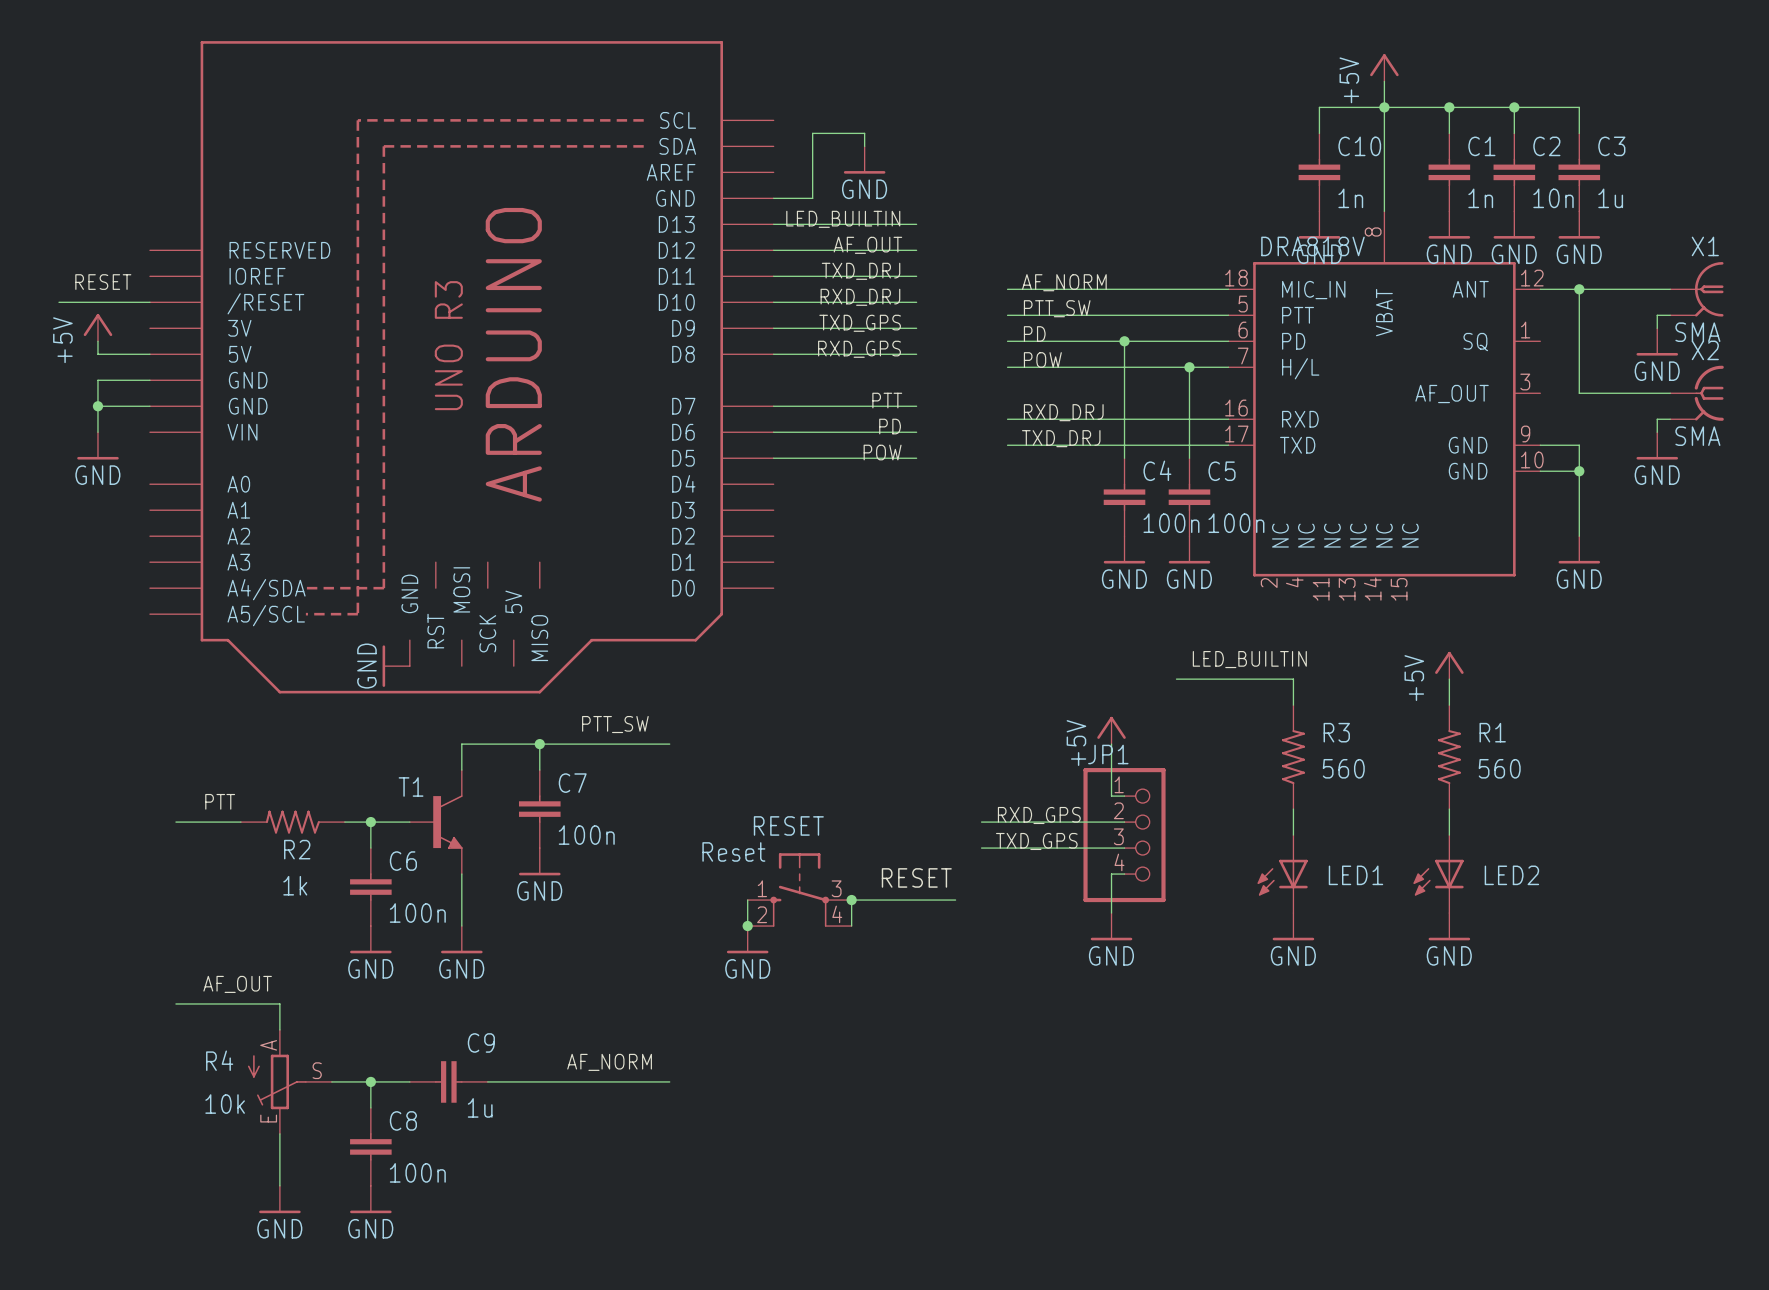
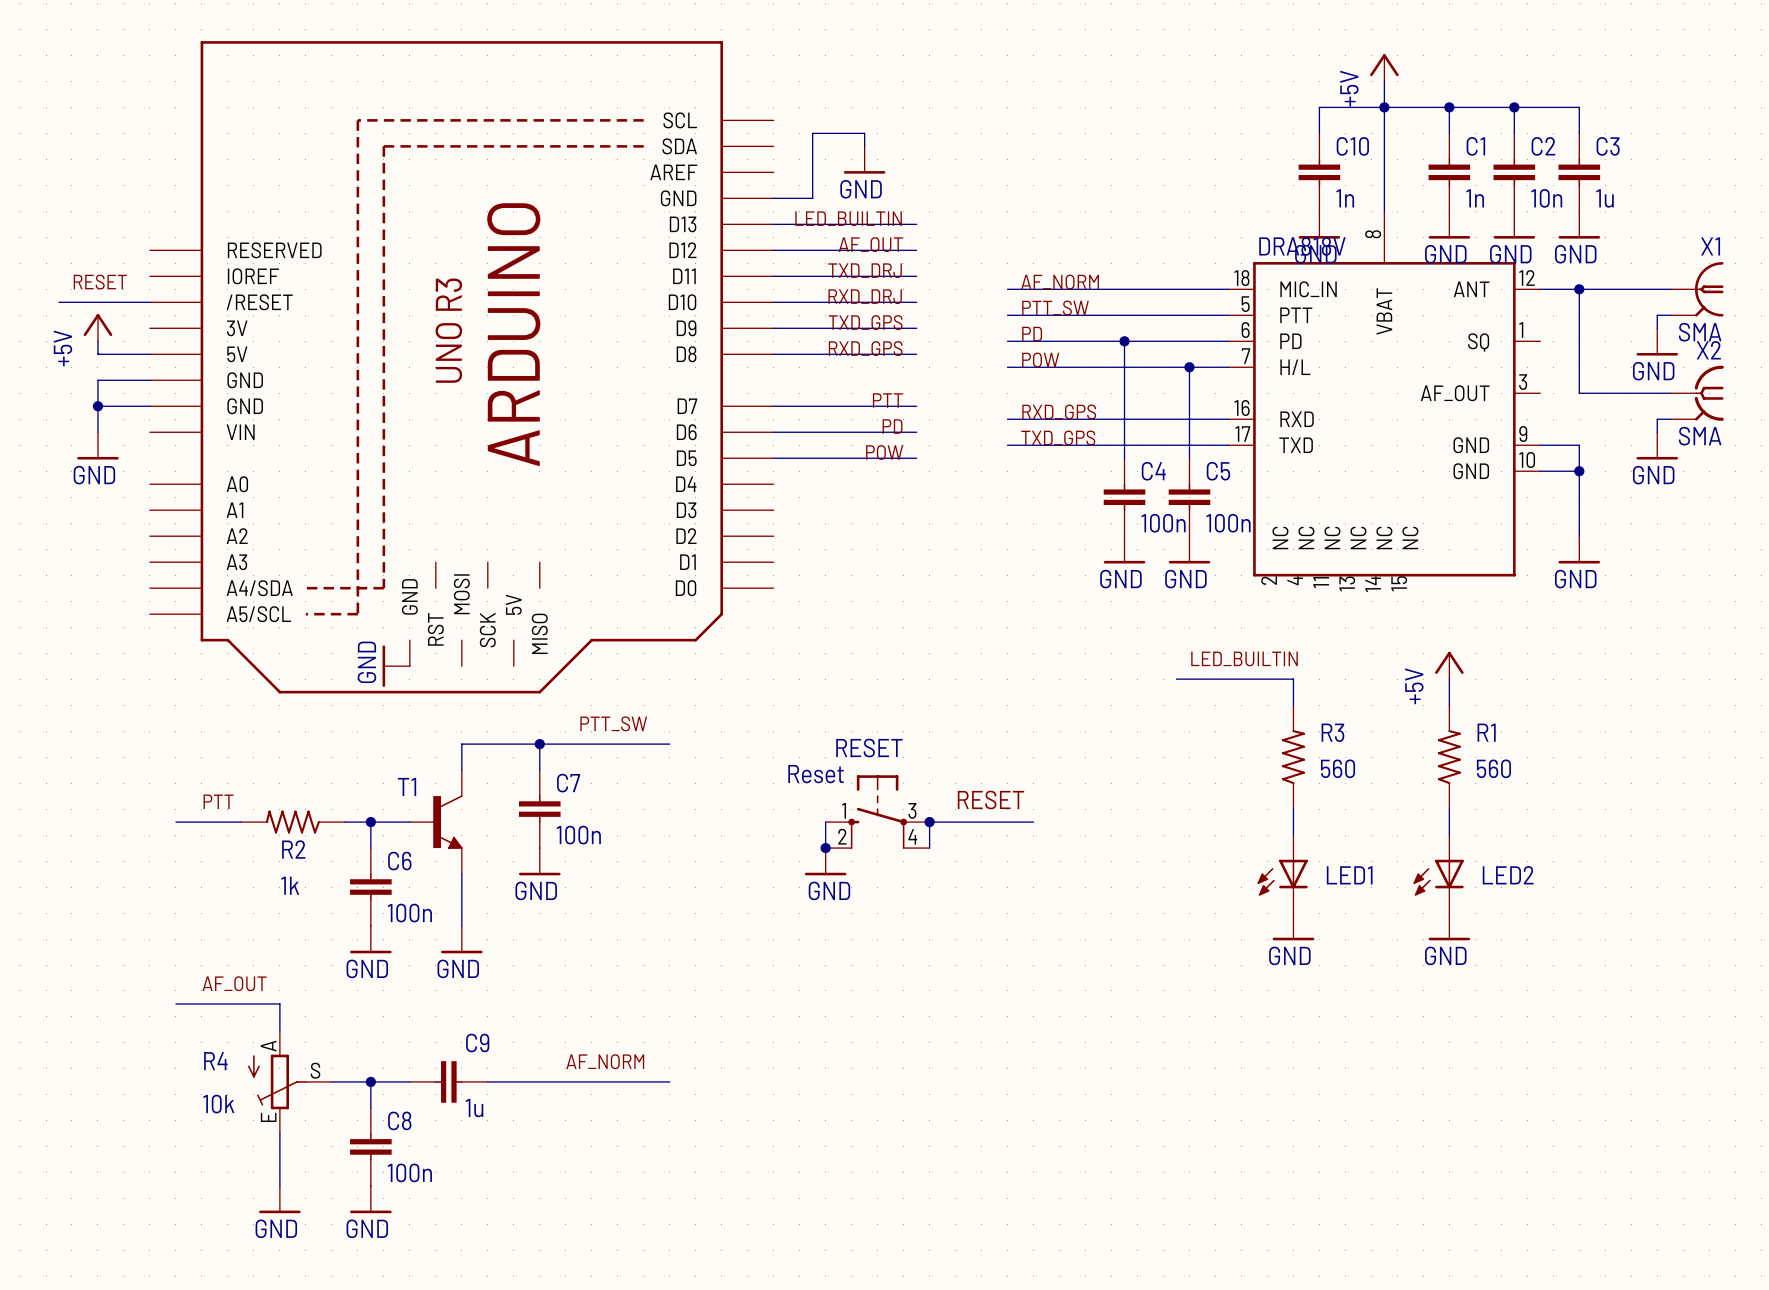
label: RXD_DRJ (1063, 412) -> RXD_GPS (1059, 411)
label: TXD_DRJ (1061, 438) -> TXD_GPS (1058, 437)
power symbol: +5V (1111, 730) -> none
wire: (1111, 744) (1111, 796) (1124, 796) -> none
label: RXD_GPS (1039, 815) -> none
junction: none -> (929, 822)
wire: none -> (981, 822) (929, 822) (929, 848)
wire: (1033, 822) (1124, 822) -> none
JP1: (1124, 835) -> none
label: TXD_GPS (1036, 841) -> none
junction: none -> (825, 848)
wire: (981, 848) (1124, 848) -> none
wire: (1124, 874) (1111, 874) (1111, 913) -> none
label position: RESET (916, 877) -> RESET (990, 799)
RESET position: (799, 890) -> (877, 812)
wire: (747, 900) (747, 926) -> (825, 822) (825, 848)
junction: (851, 900) -> none
wire: (955, 900) (851, 900) (851, 926) -> none
junction: (747, 926) -> none
power symbol: GND (1111, 926) -> none
power symbol position: GND (747, 939) -> GND (825, 861)

